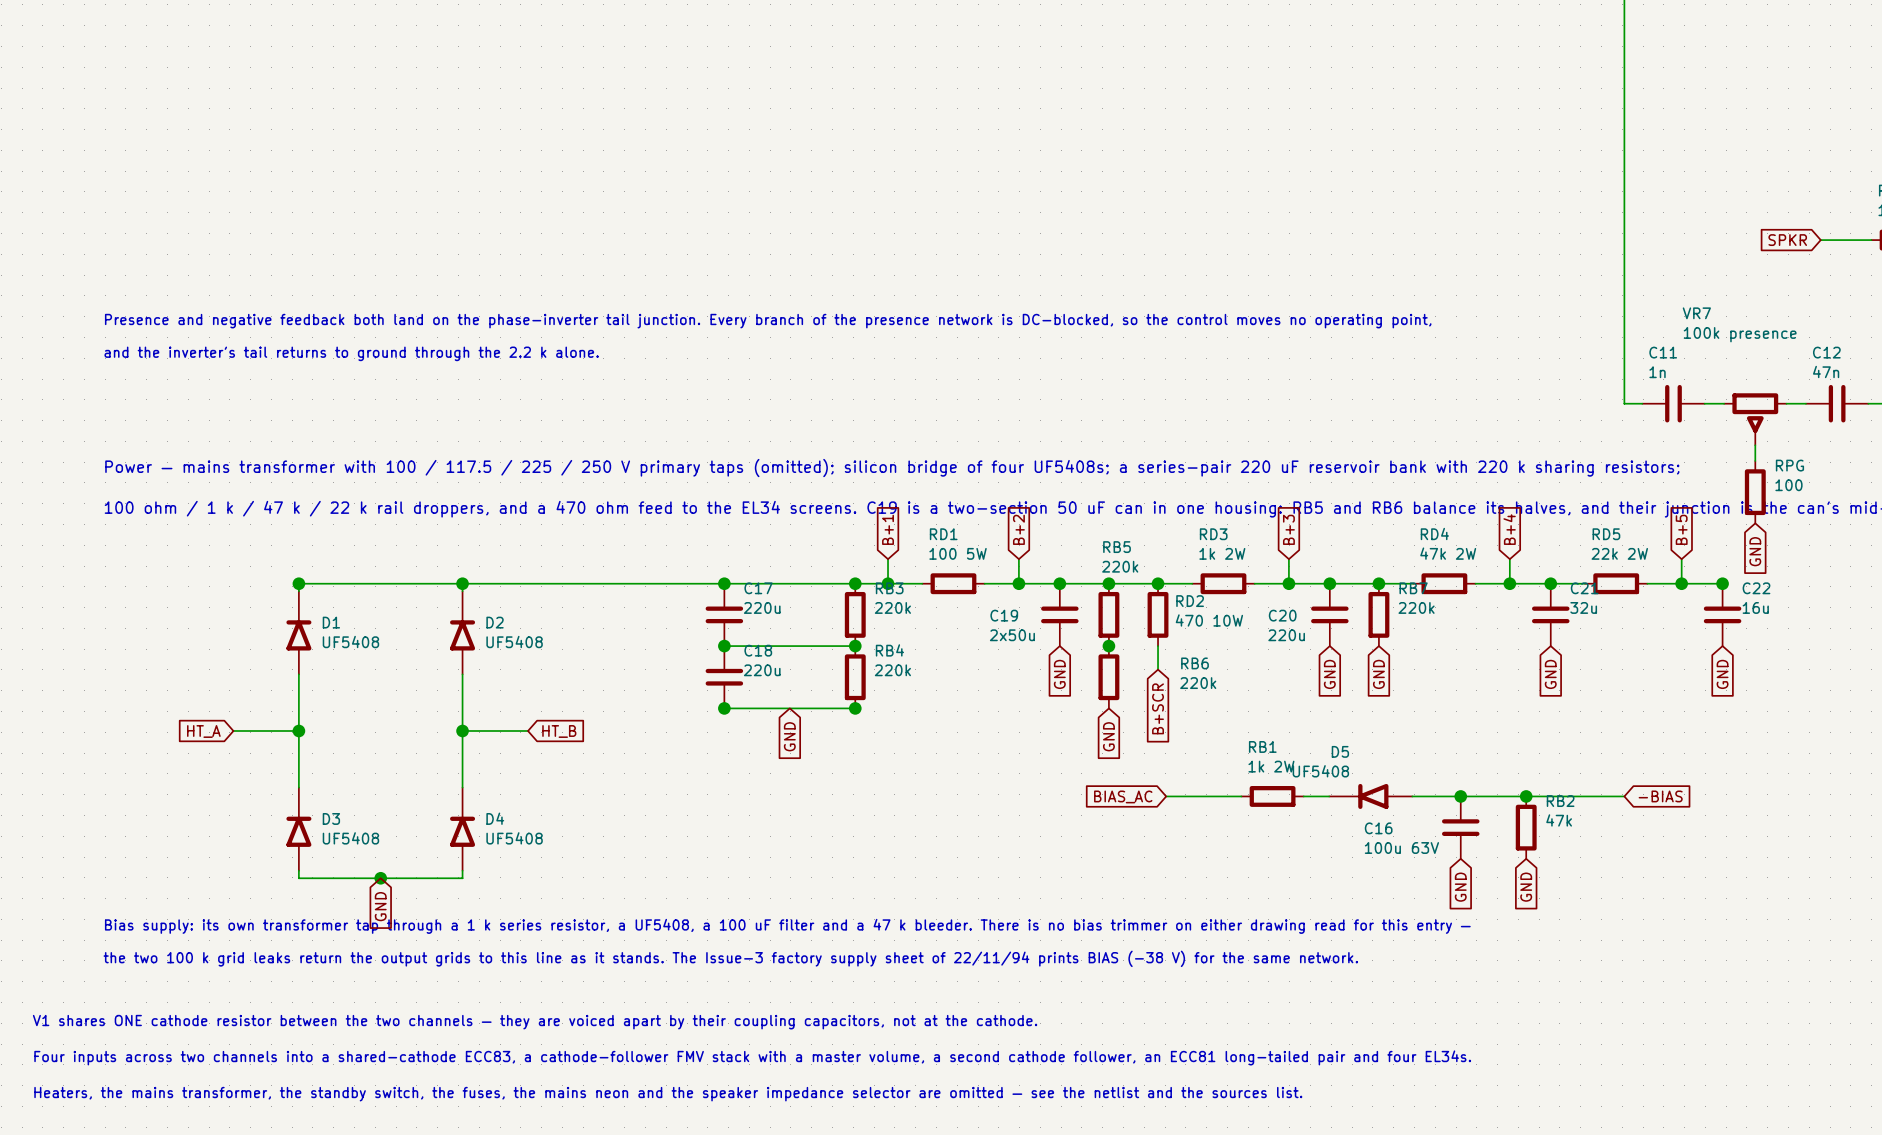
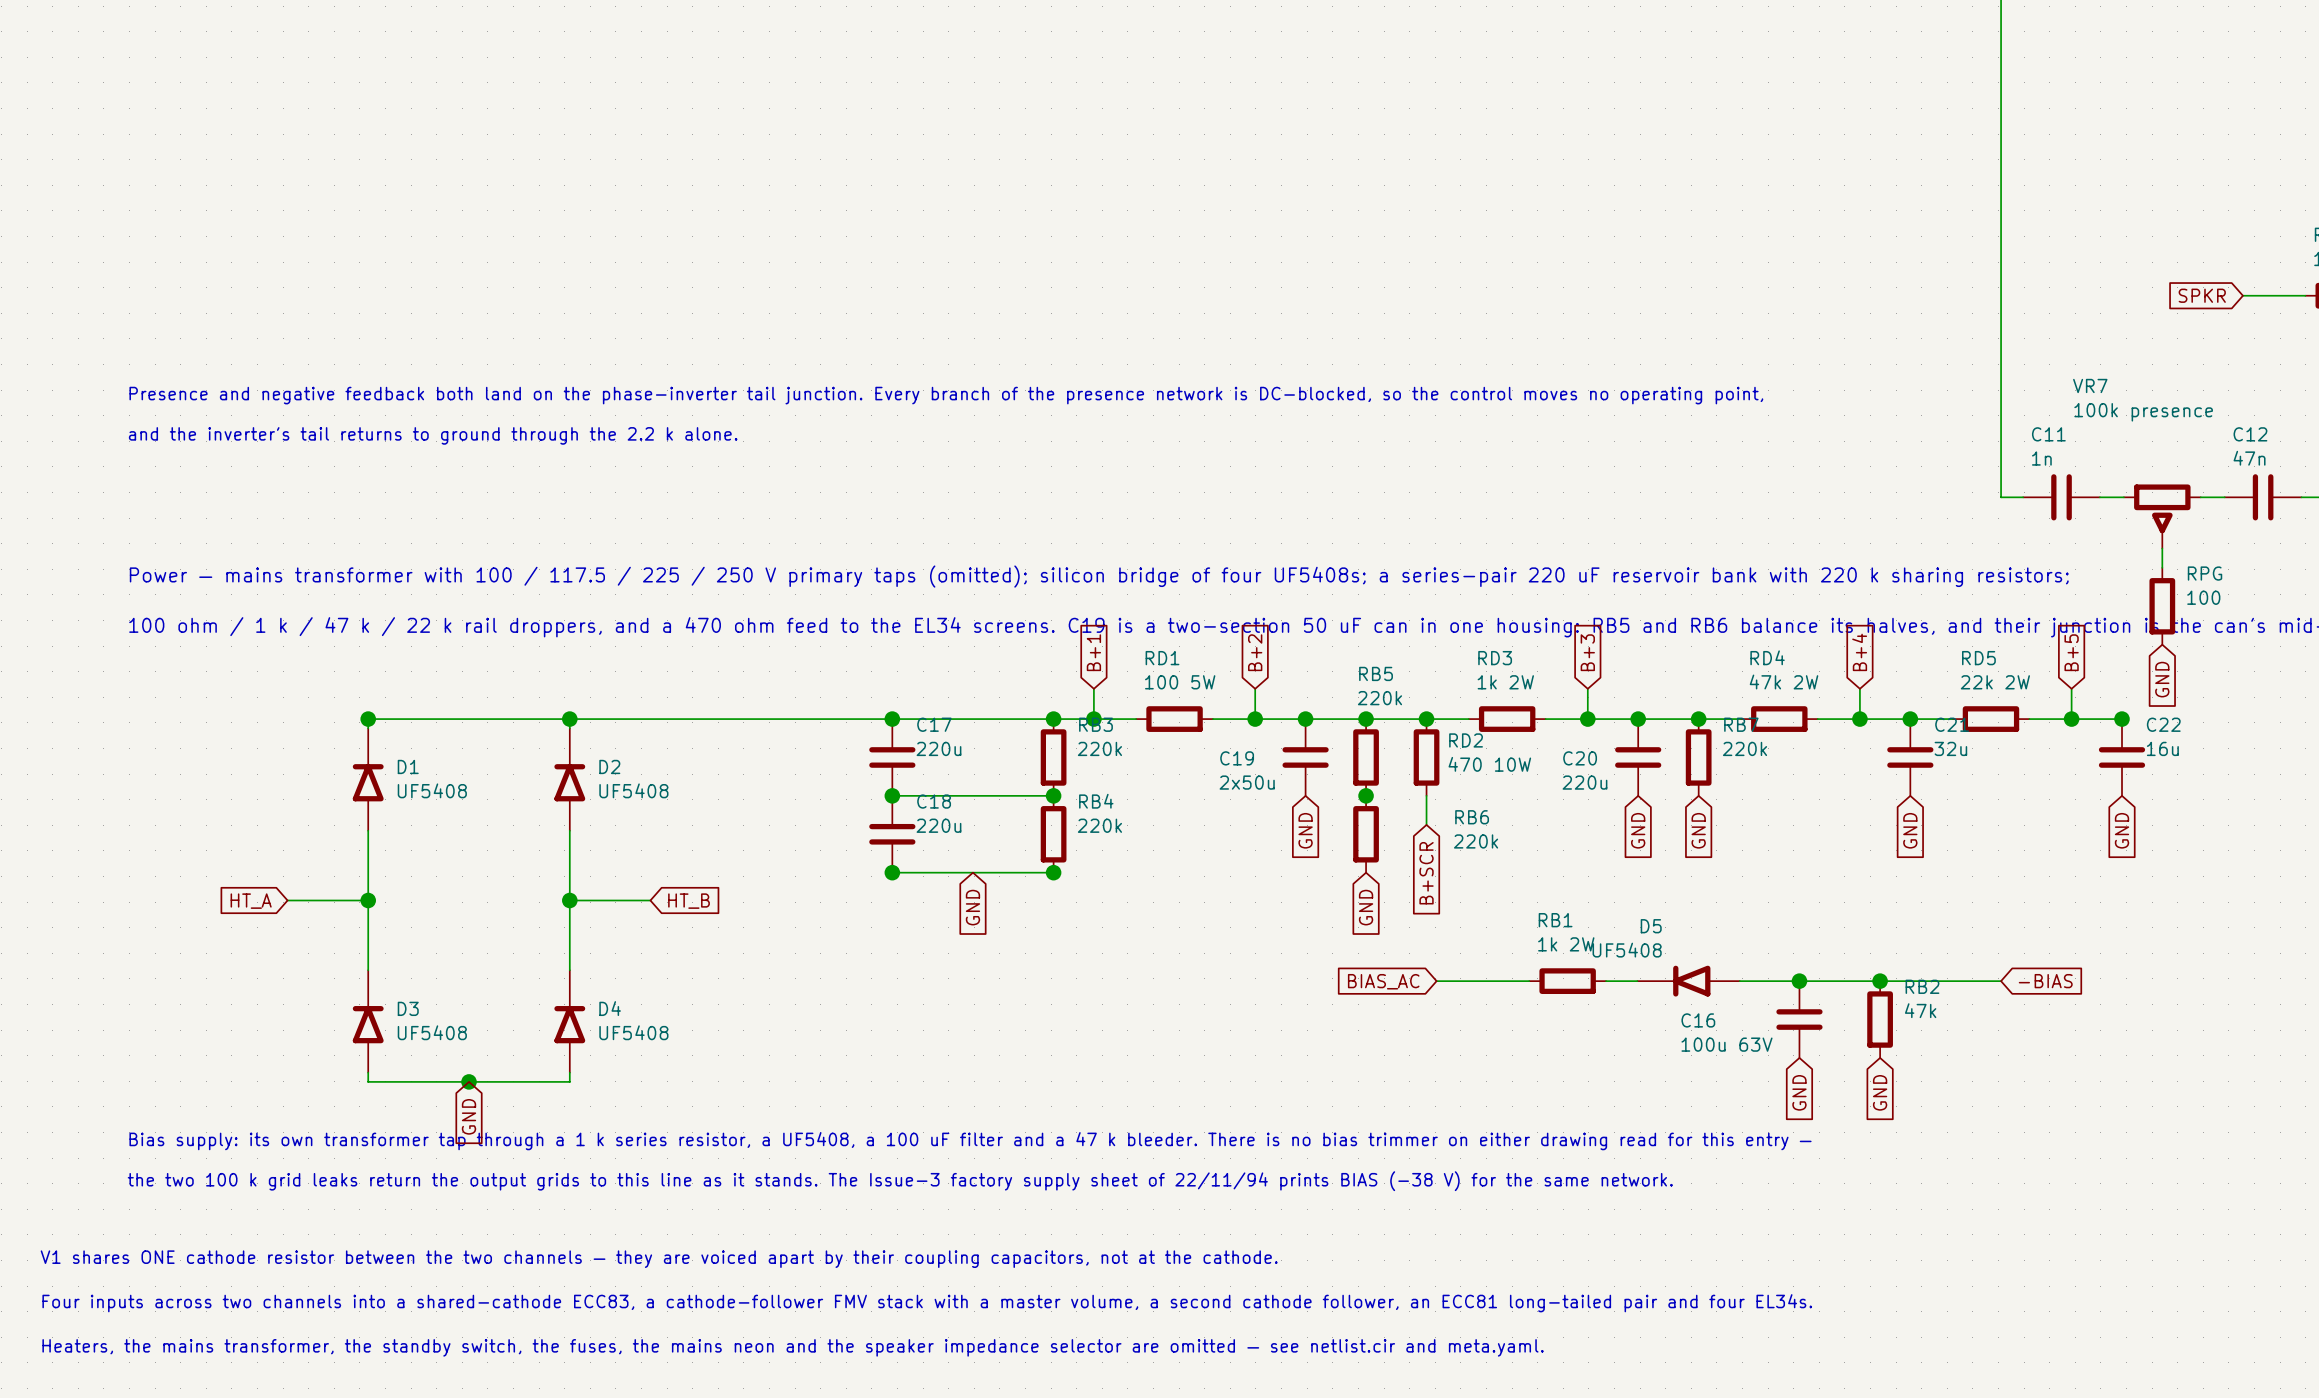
text: Heaters, the mains transformer, the standby switch, the fuses, the mains neon and the speaker impedance selector are omitted — see the netlist and the sources list. (668, 1094) -> Heaters, the mains transformer, the standby switch, the fuses, the mains neon and the speaker impedance selector are omitted — see netlist.cir and meta.yaml. (793, 1347)

